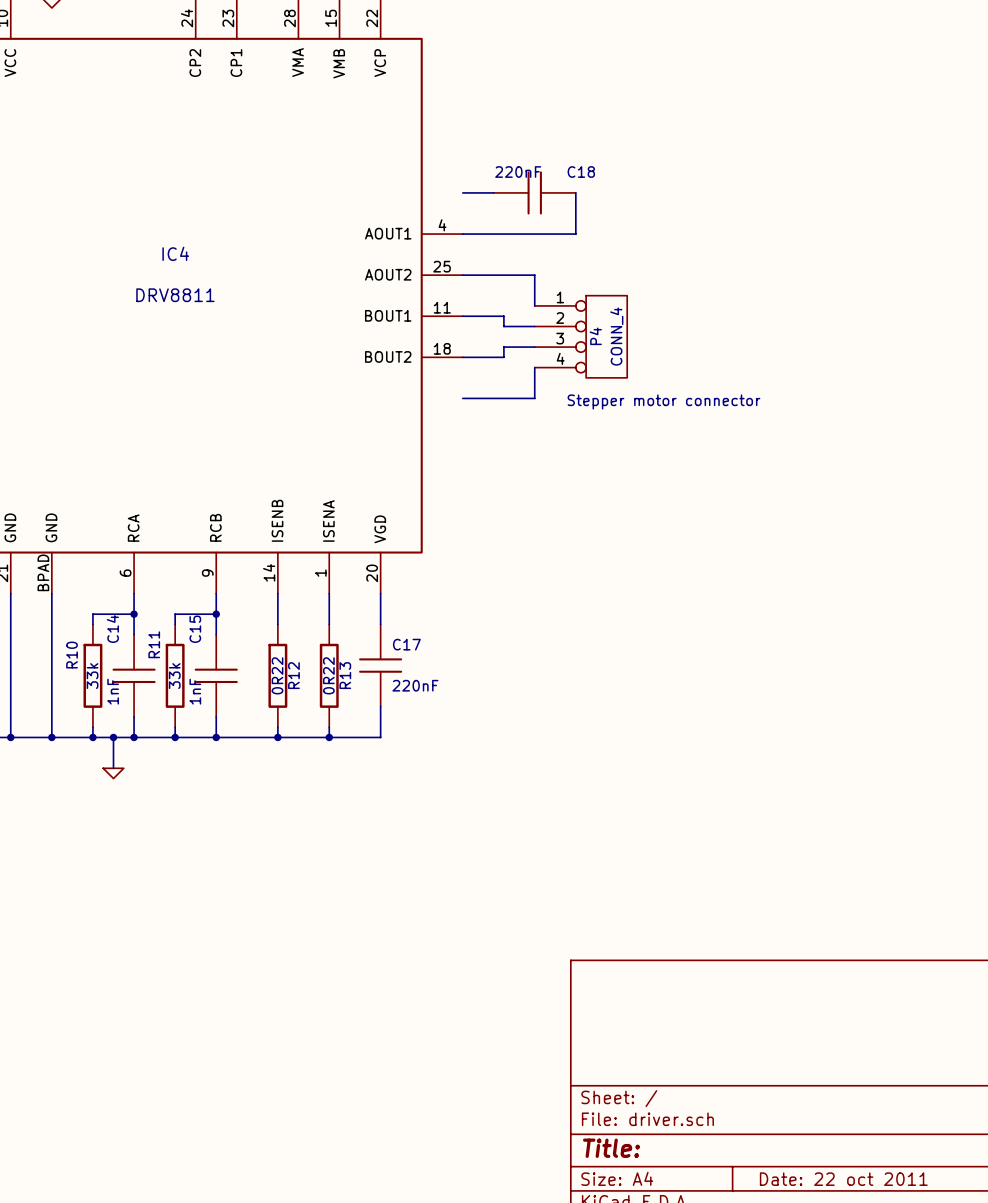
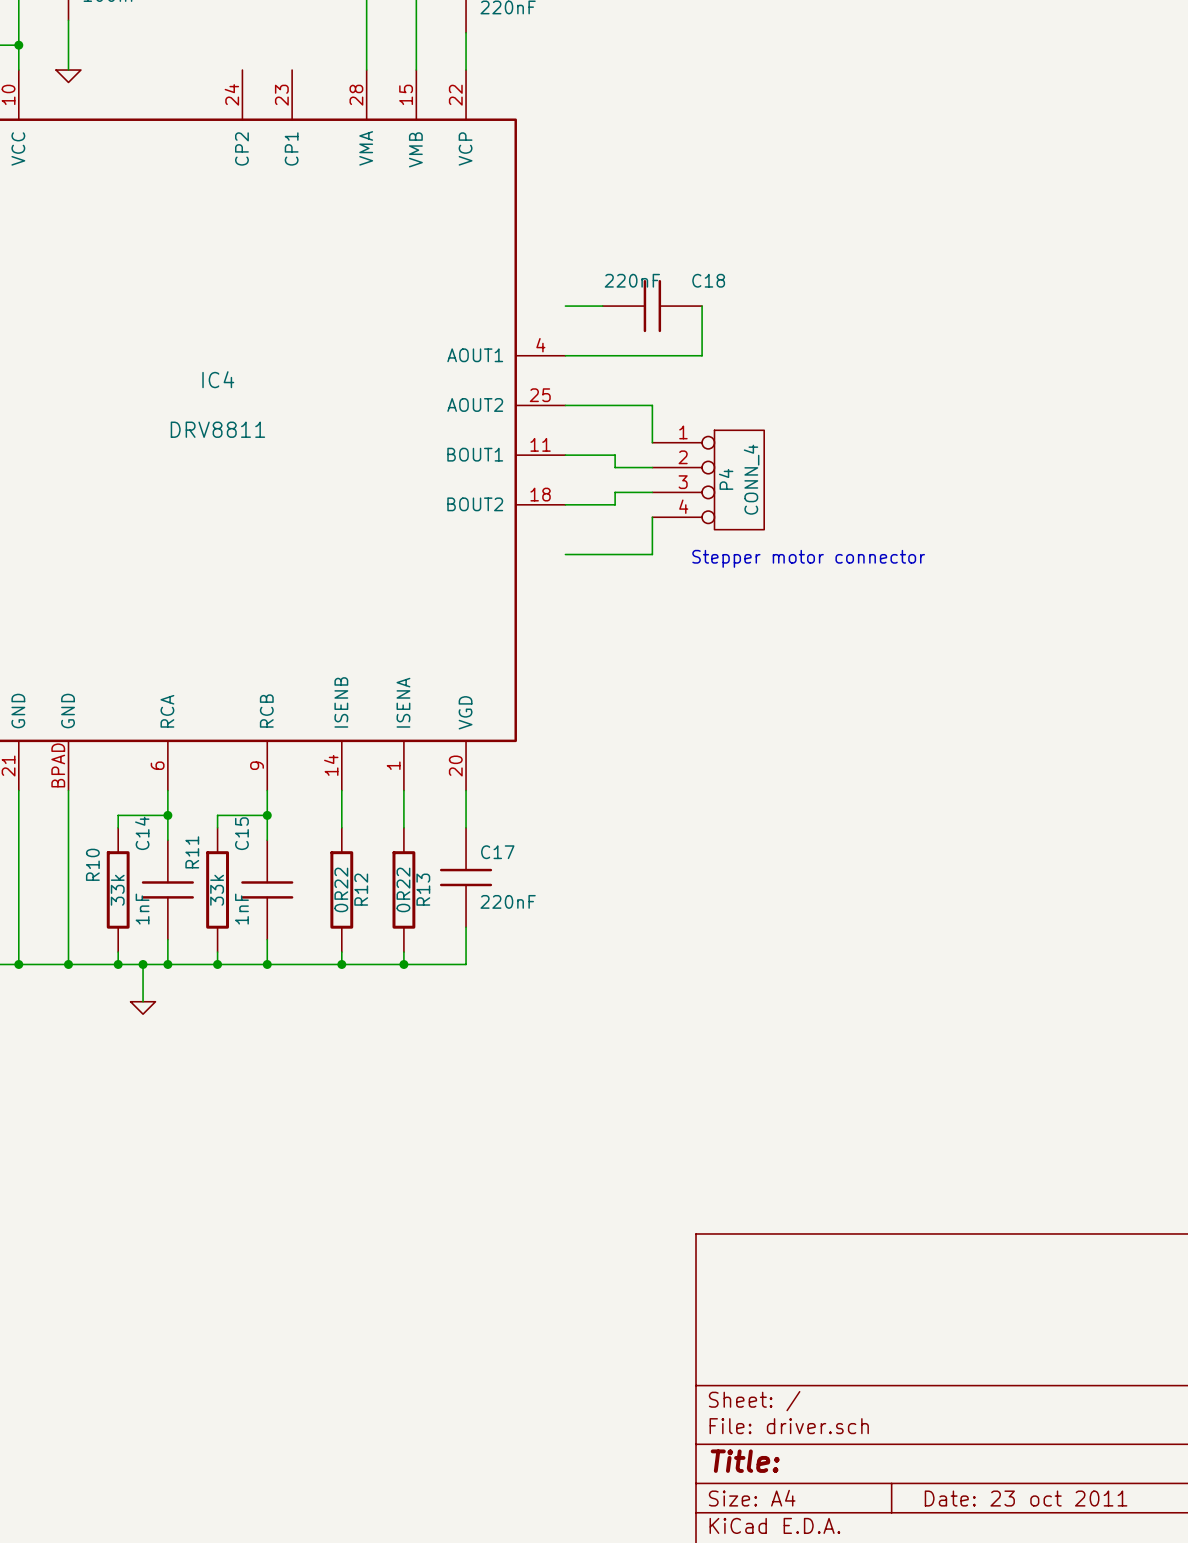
title block: Date: 22 oct 2011 (843, 1179) -> Date: 23 oct 2011 (1026, 1498)

